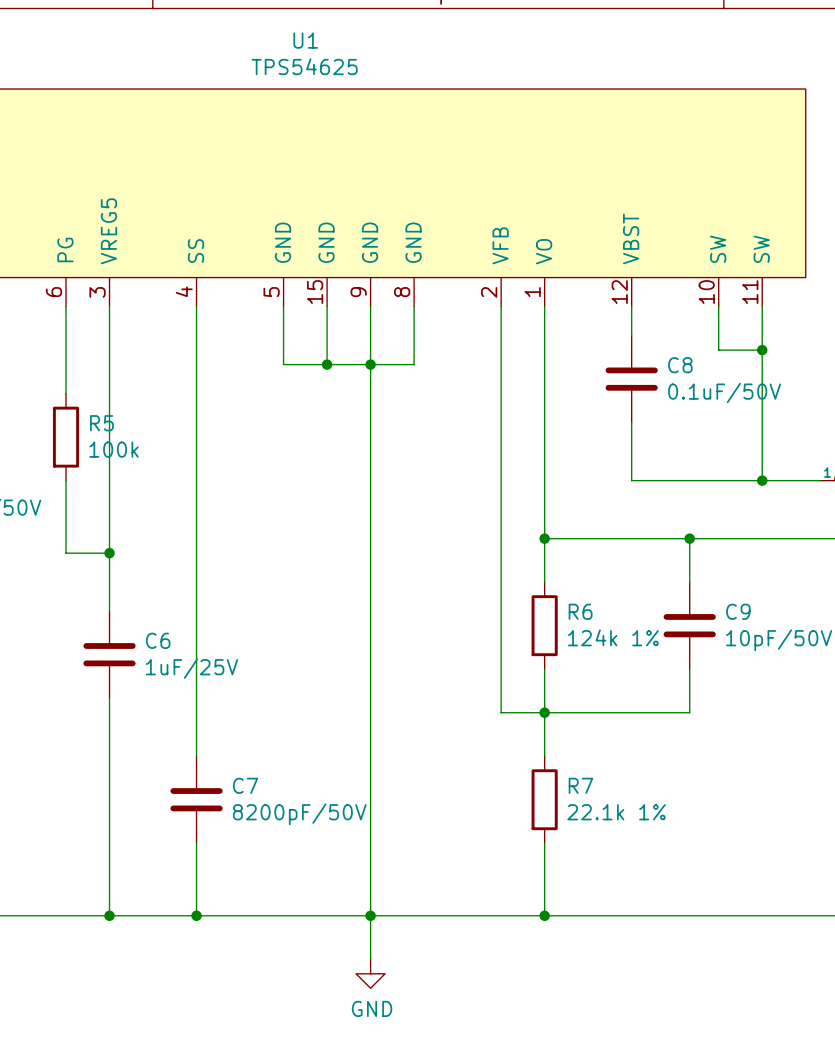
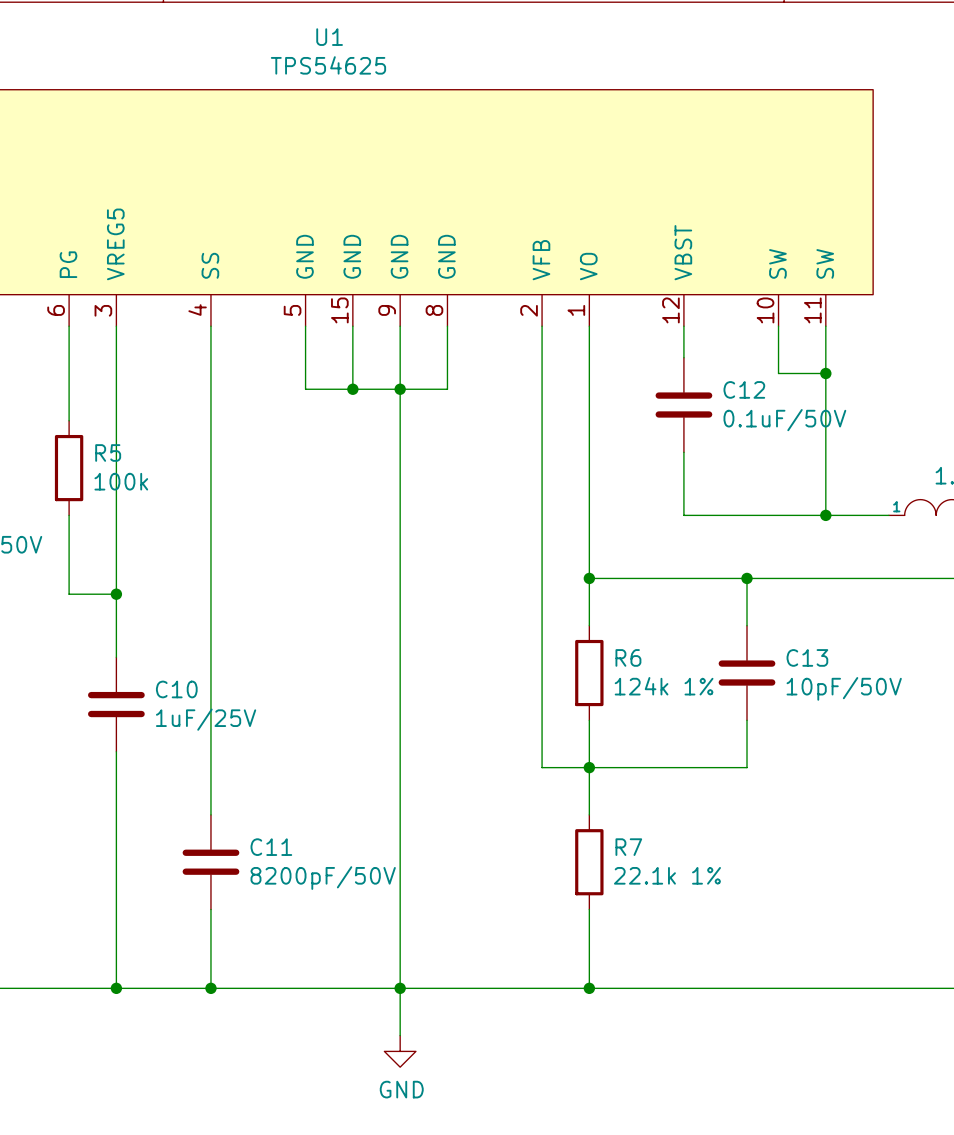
C8 name: C8 (680, 365) -> C12 (744, 389)
C9 name: C9 (738, 611) -> C13 (807, 657)
C6 name: C6 (158, 640) -> C10 (176, 689)
C7 name: C7 (245, 785) -> C11 (271, 847)

